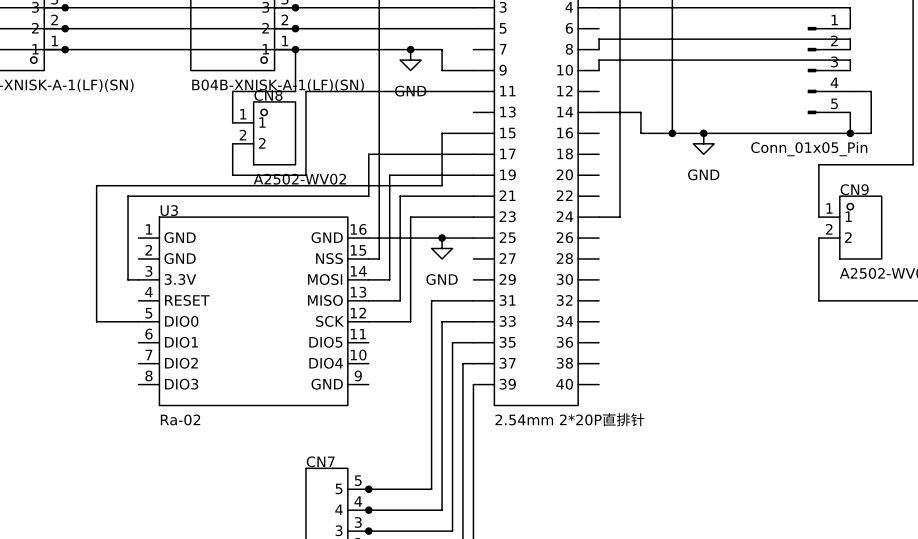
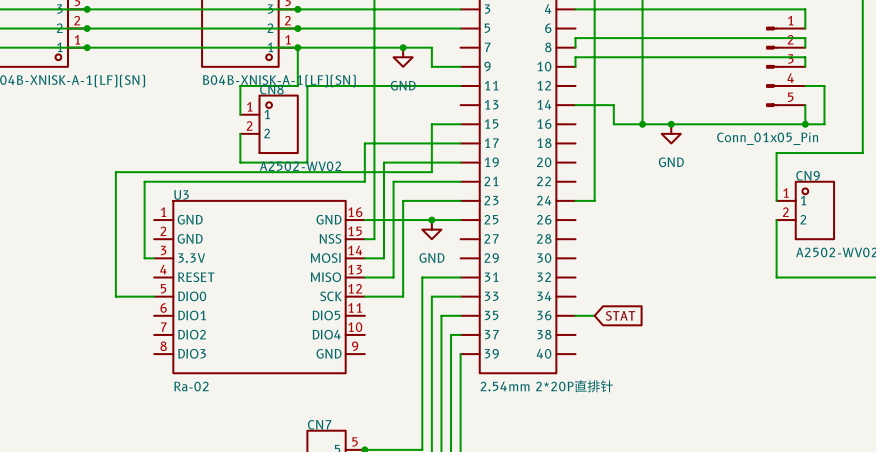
wire: none -> (575, 315) (594, 315)
global label: none -> STAT (620, 315)

